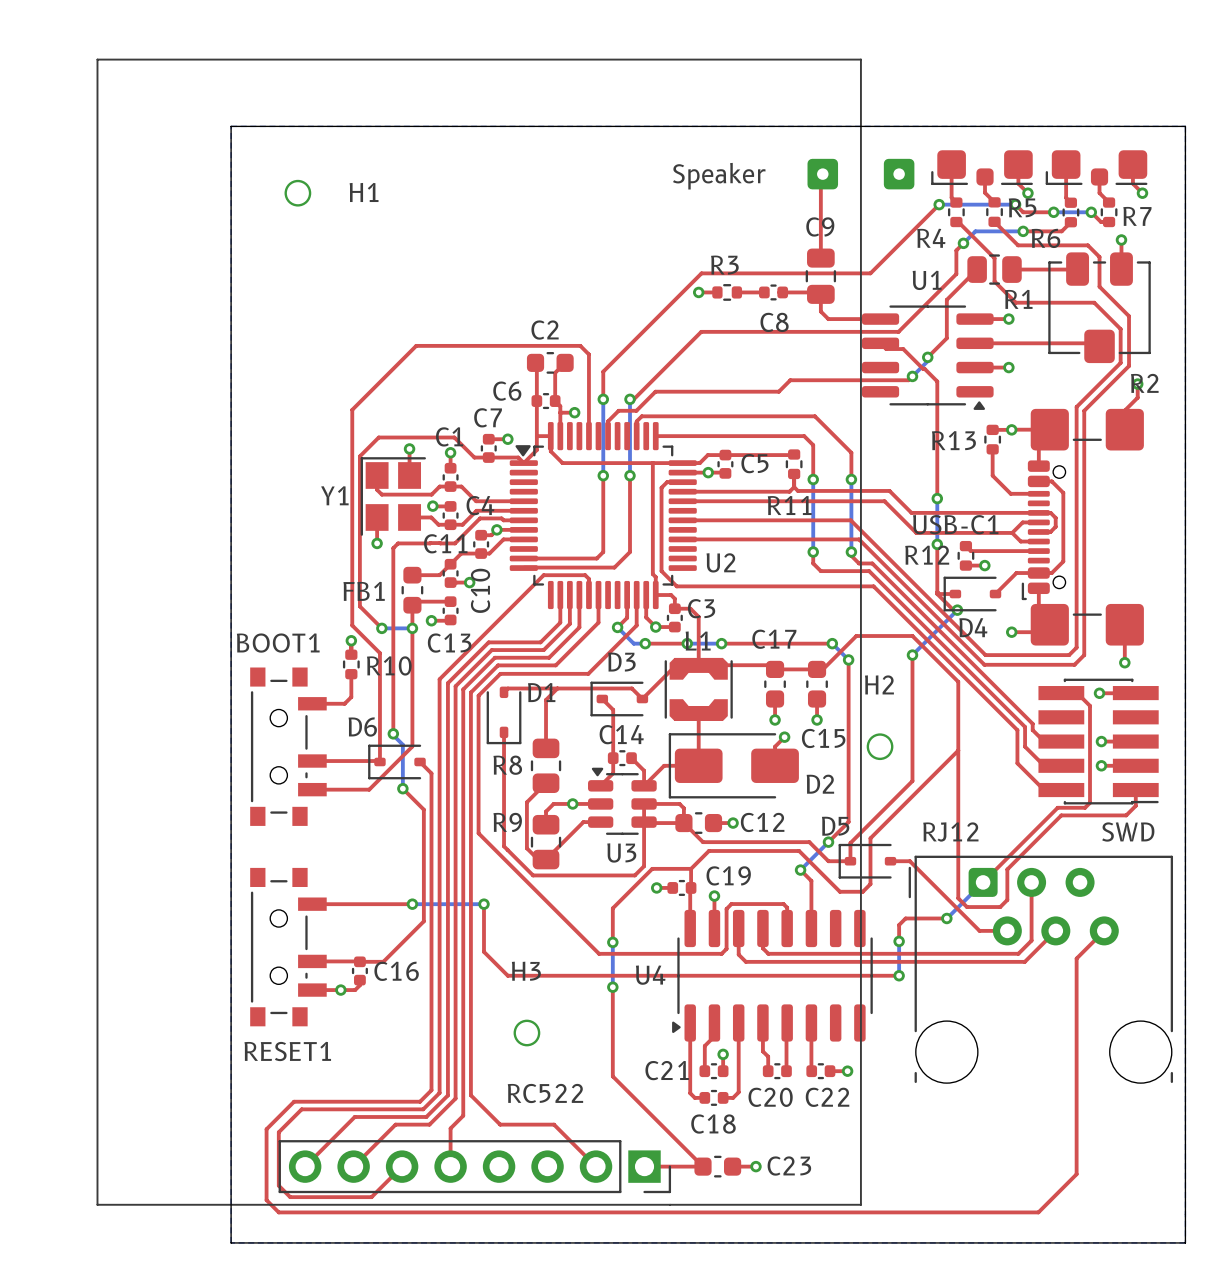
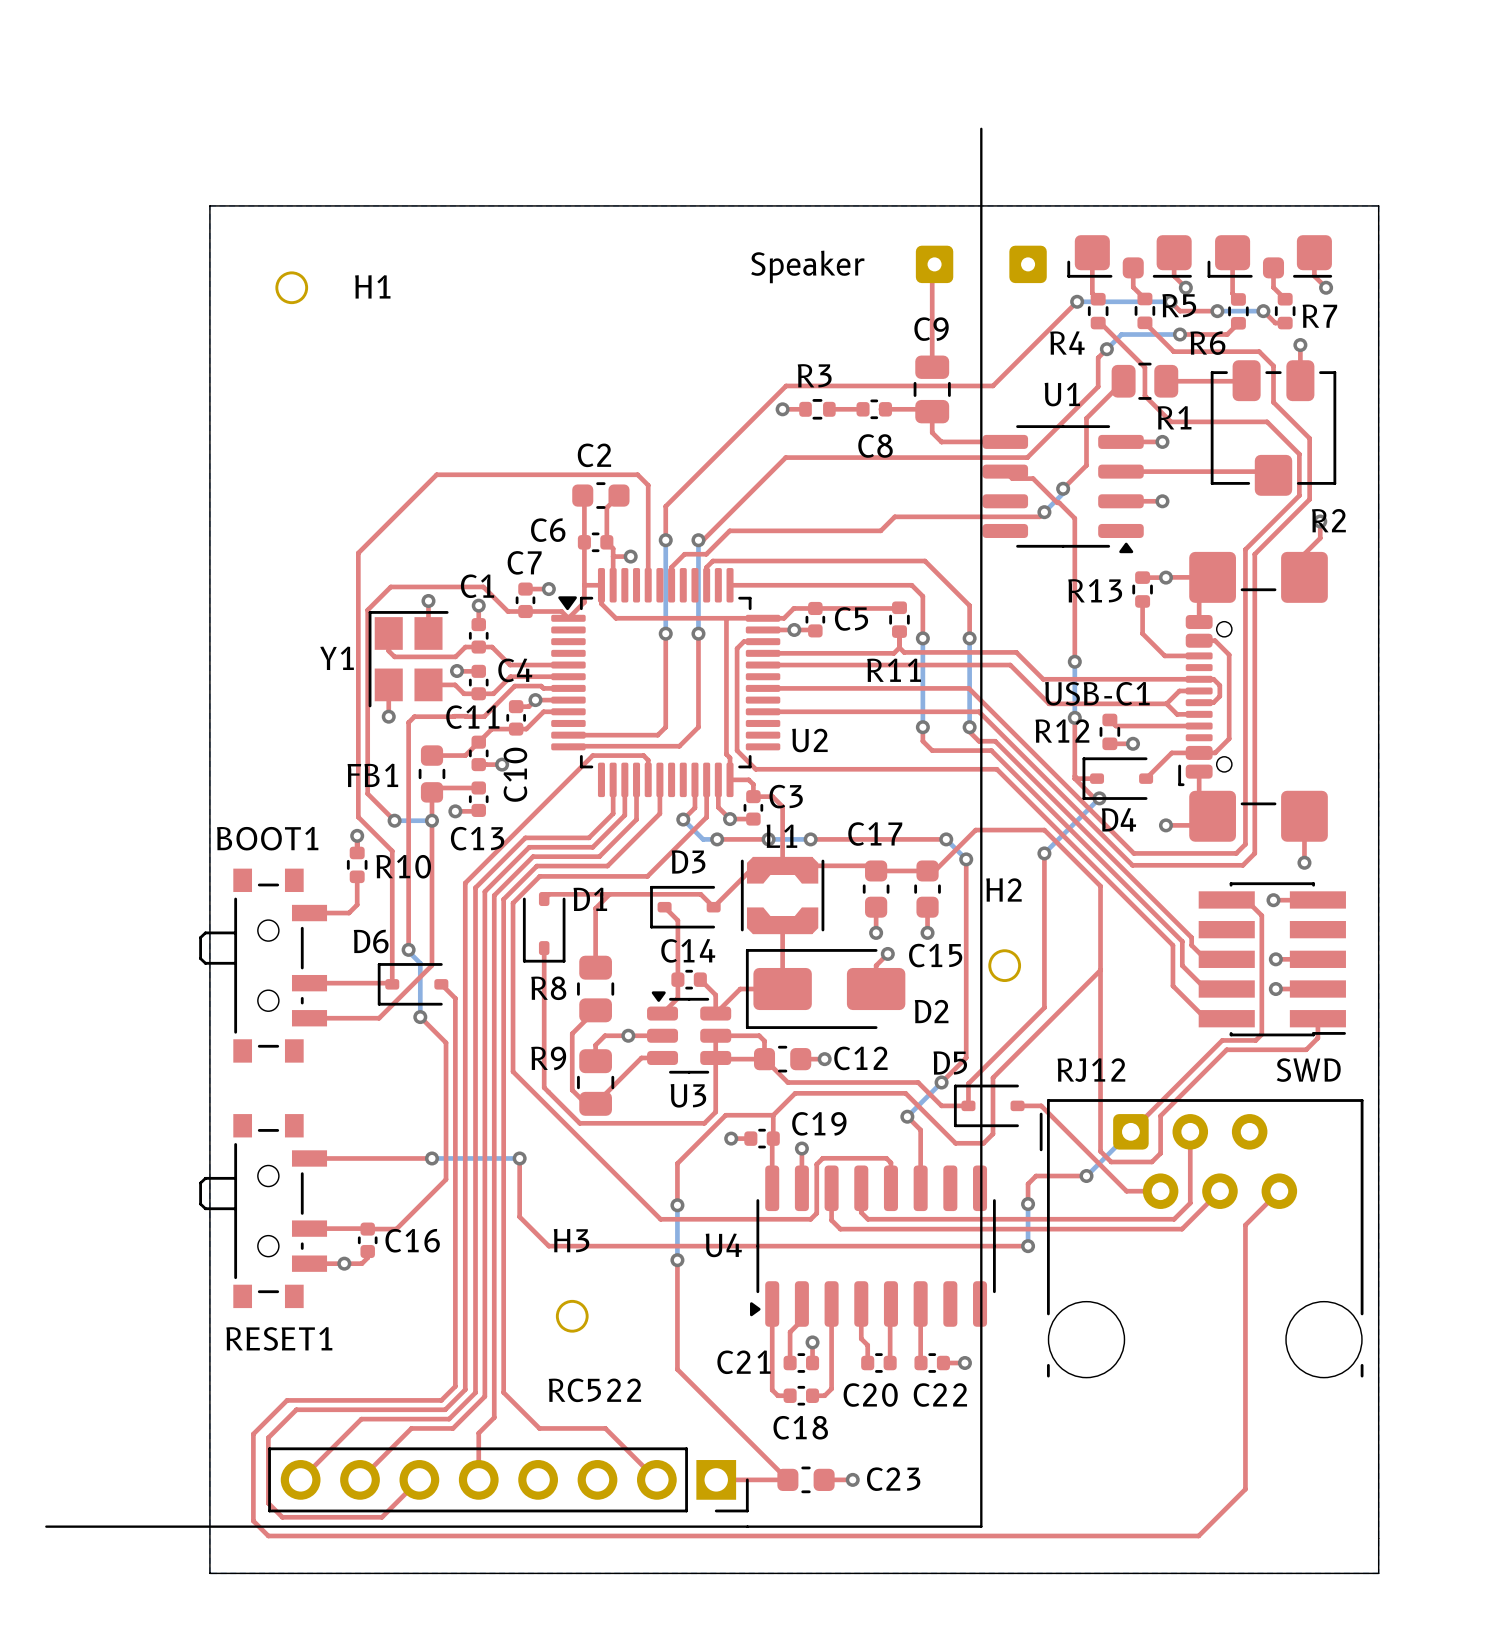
line: (860, 63) (860, 59) (97, 59) (97, 1204) -> none
BOOT1 footprint: [250, 667, 327, 826] -> [199, 868, 328, 1063]
RESET1 footprint: [250, 867, 327, 1027] -> [199, 1114, 328, 1309]

